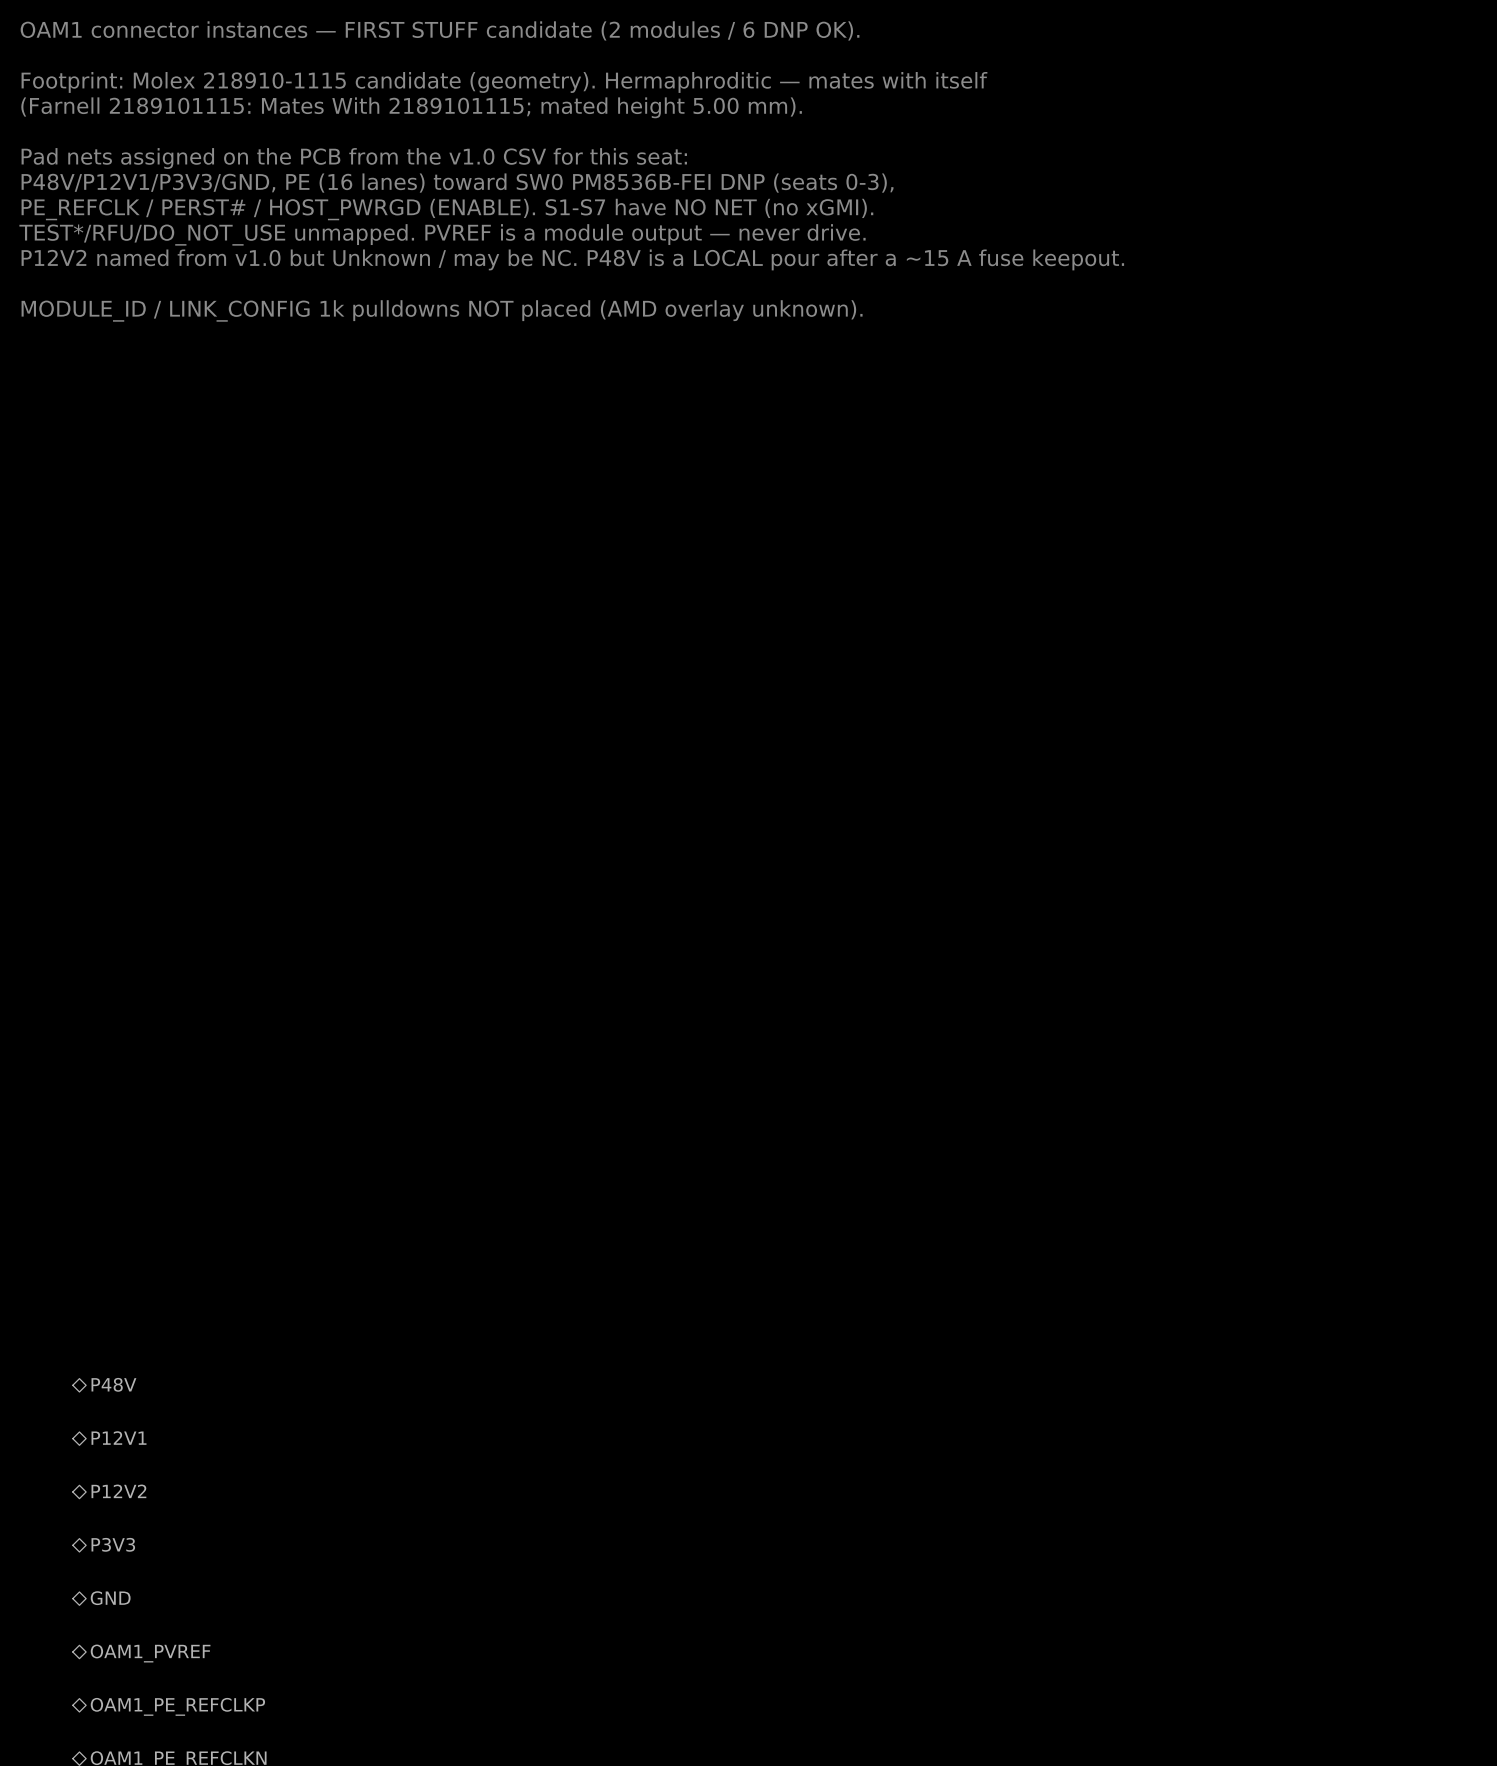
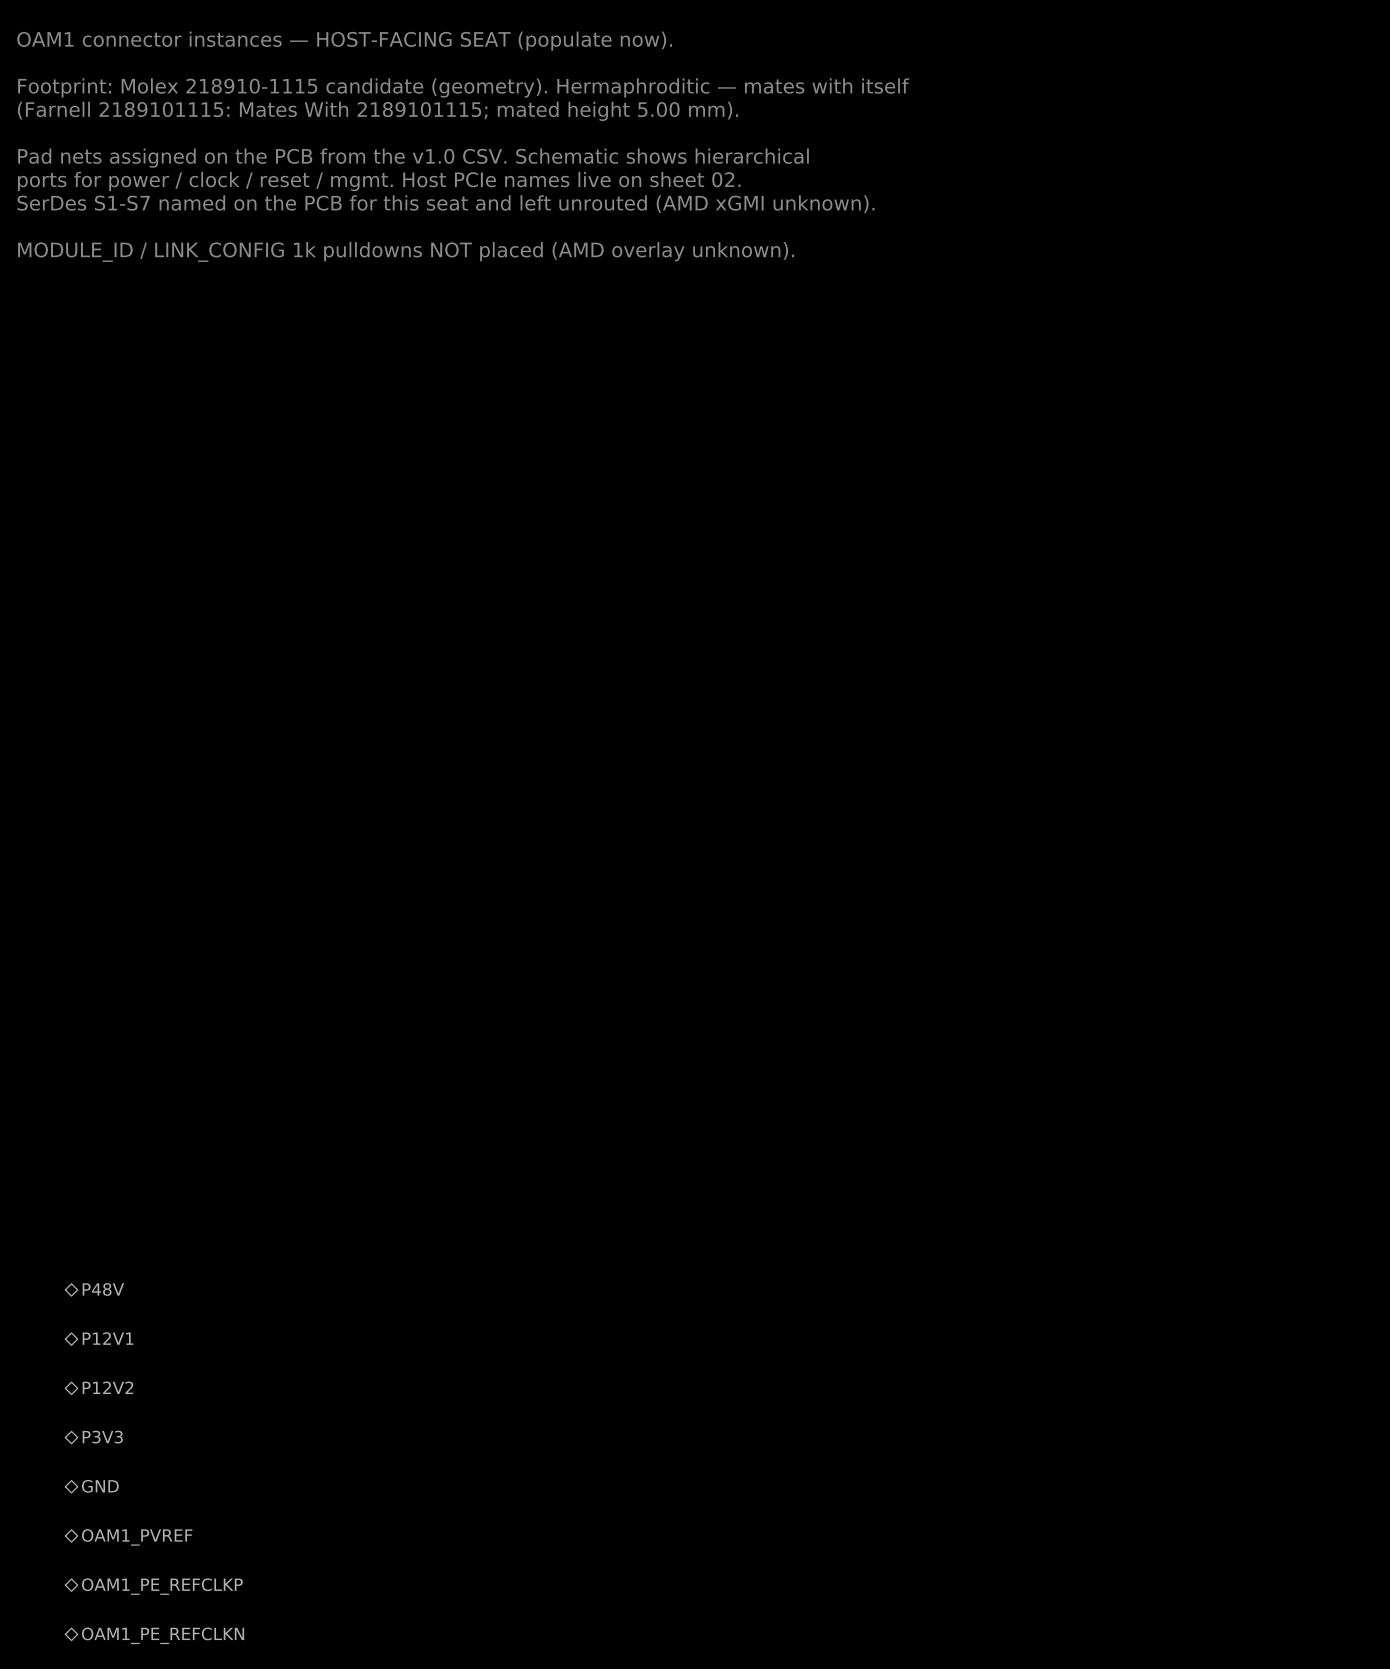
text: OAM1 connector instances — FIRST STUFF candidate (2 modules / 6 DNP OK). (440, 30) -> OAM1 connector instances — HOST-FACING SEAT (populate now). (344, 41)
text: Pad nets assigned on the PCB from the v1.0 CSV for this seat: (354, 158) -> Pad nets assigned on the PCB from the v1.0 CSV. Schematic shows hierarchical (413, 158)
text: P48V/P12V1/P3V3/GND, PE (16 lanes) toward SW0 PM8536B-FEI DNP (seats 0-3), (457, 183) -> ports for power / clock / reset / mgmt. Host PCIe names live on sheet 02. (379, 181)
text: PE_REFCLK / PERST# / HOST_PWRGD (ENABLE). S1-S7 have NO NET (no xGMI). (447, 209) -> SerDes S1-S7 named on the PCB for this seat and left unrouted (AMD xGMI unknown). (445, 204)
text: TEST*/RFU/DO_NOT_USE unmapped. PVREF is a module output — never drive. (442, 234) -> none
text: P12V2 named from v1.0 but Unknown / may be NC. P48V is a LOCAL pour after a ~15 A fuse keepout. (572, 259) -> MODULE_ID / LINK_CONFIG 1k pulldowns NOT placed (AMD overlay unknown). (406, 251)
text: MODULE_ID / LINK_CONFIG 1k pulldowns NOT placed (AMD overlay unknown). (442, 310) -> none

